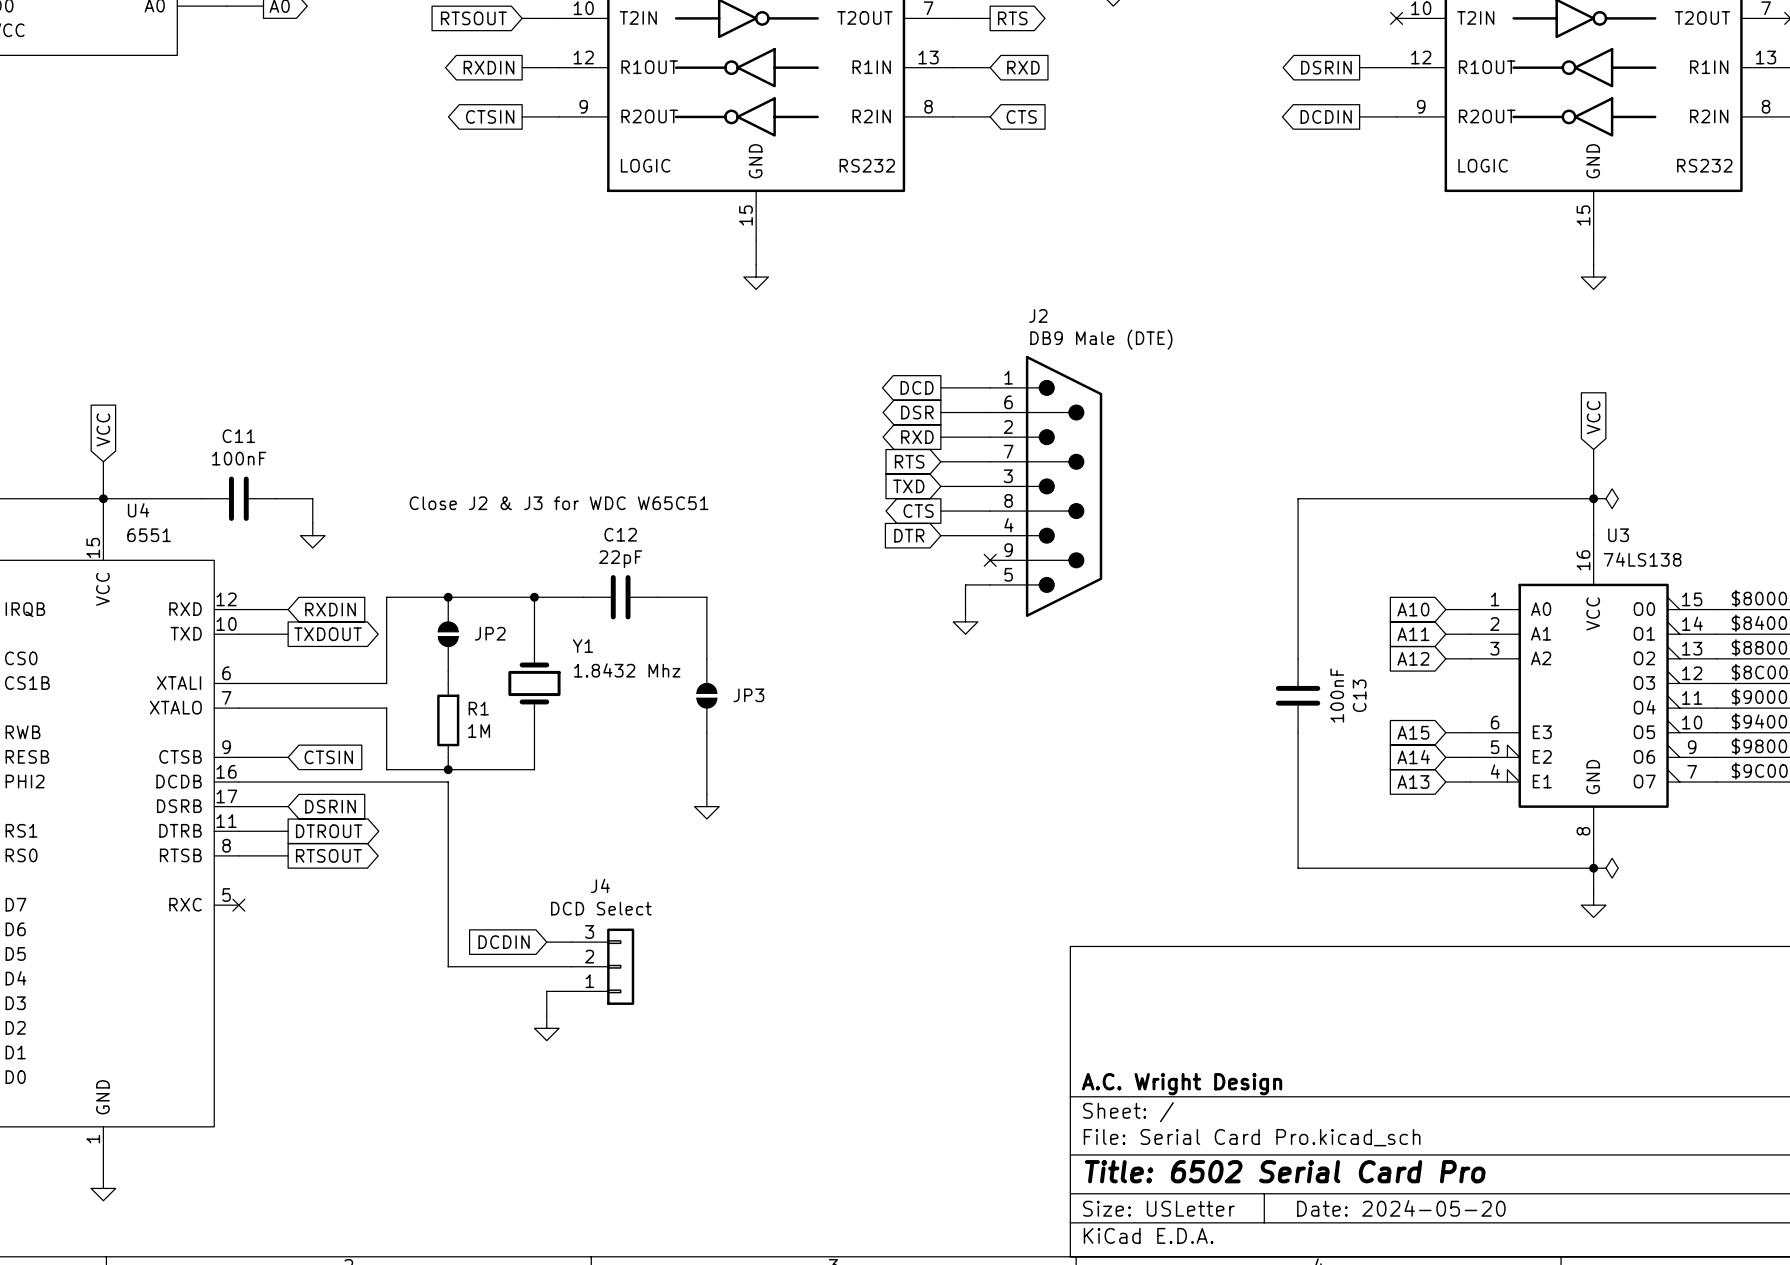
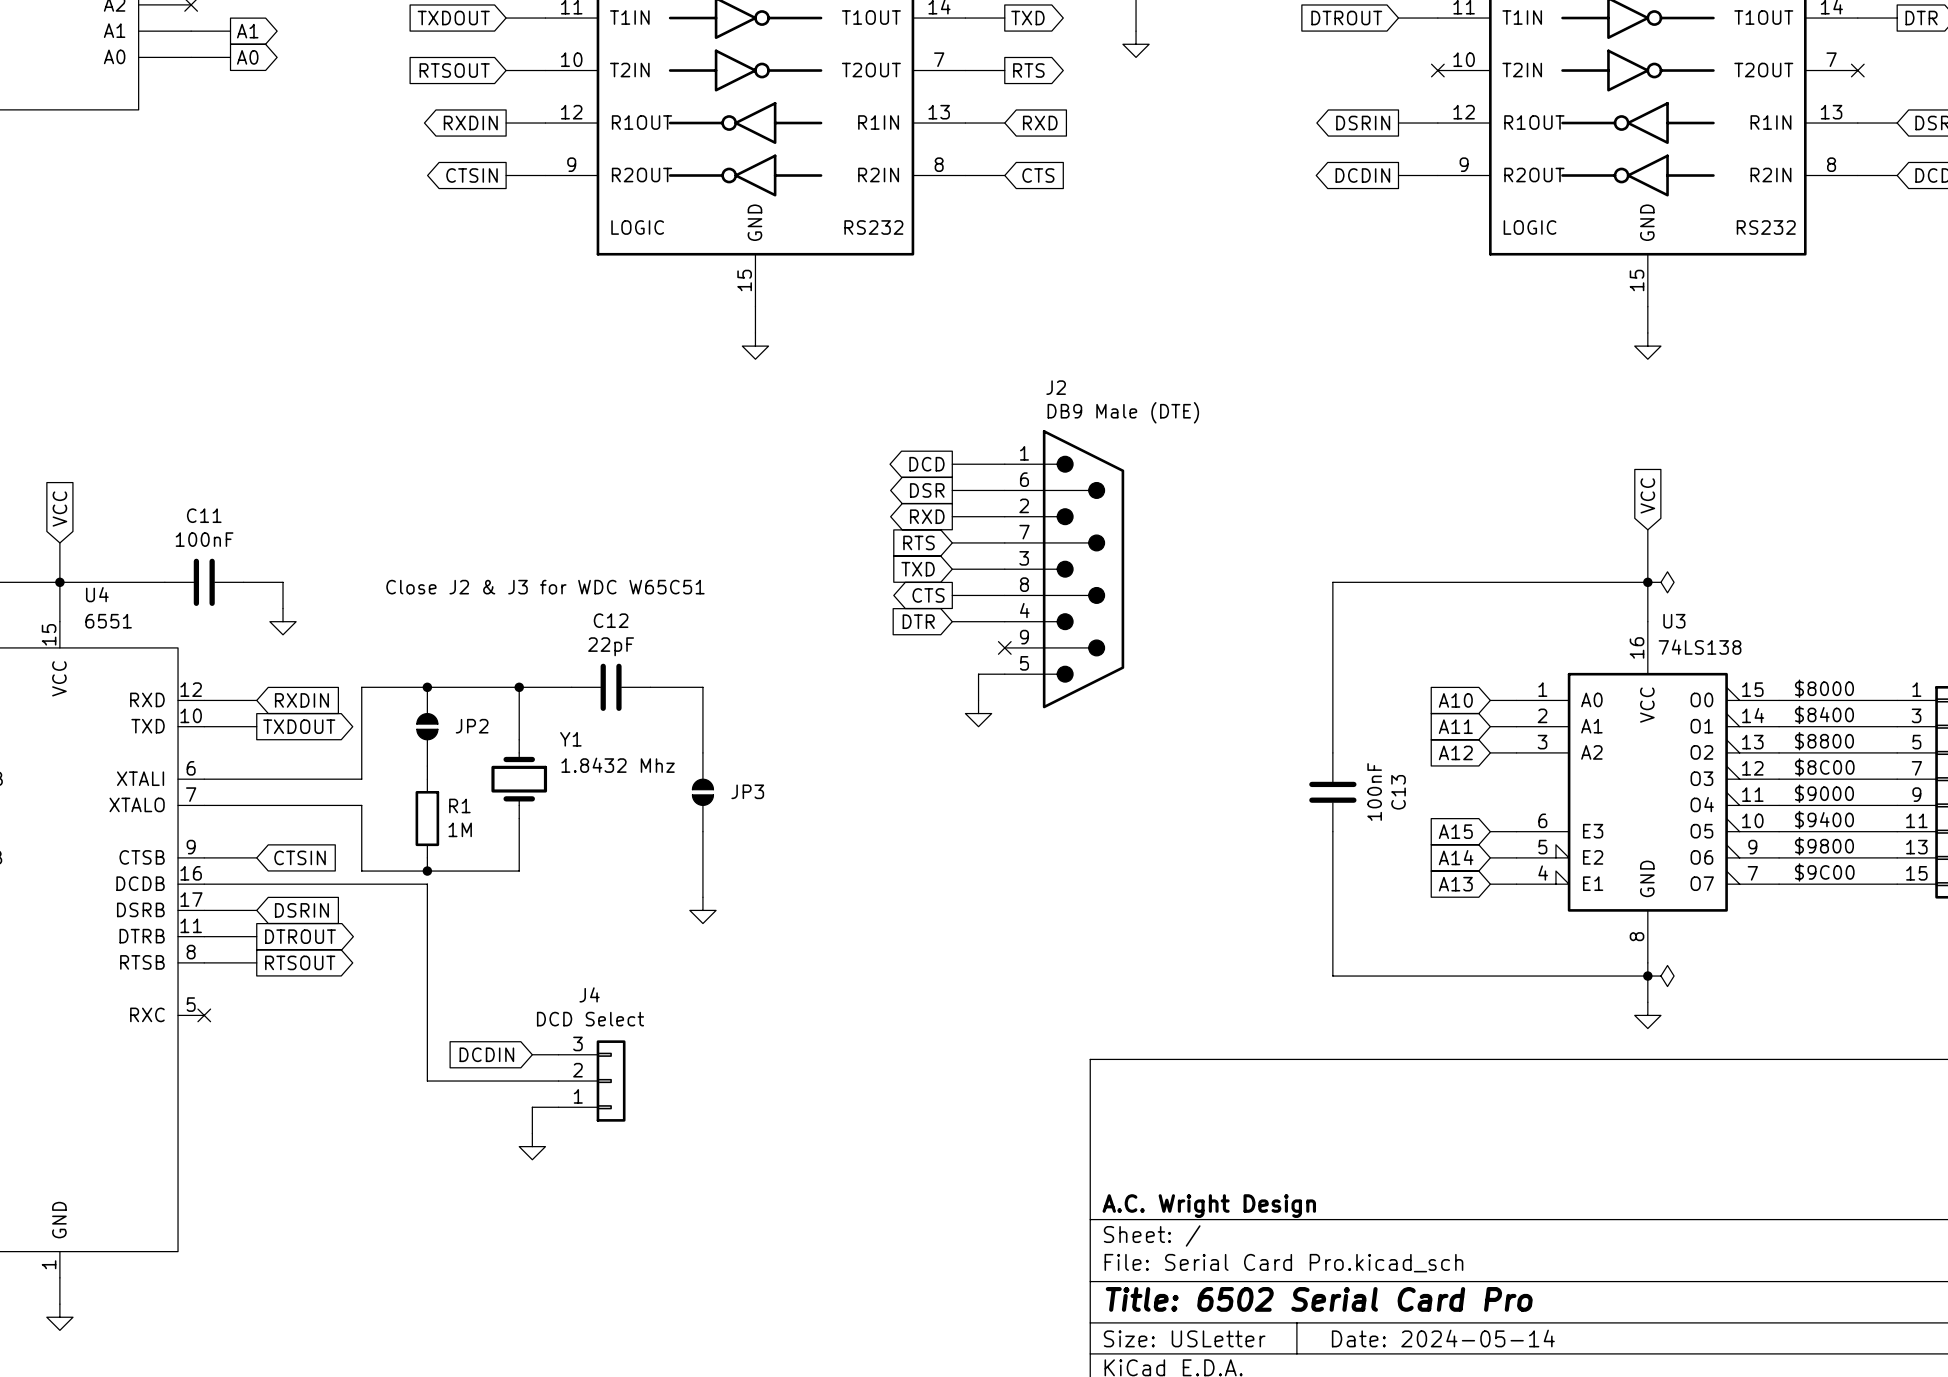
title block: Date: 2024-05-20 (1401, 1208) -> Date: 2024-05-14 (1443, 1338)

